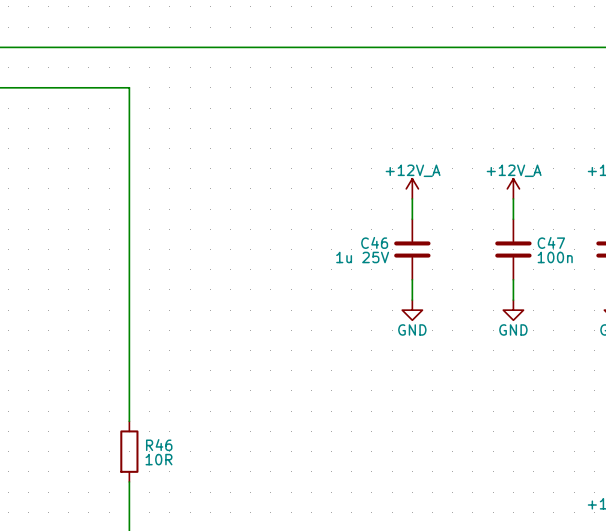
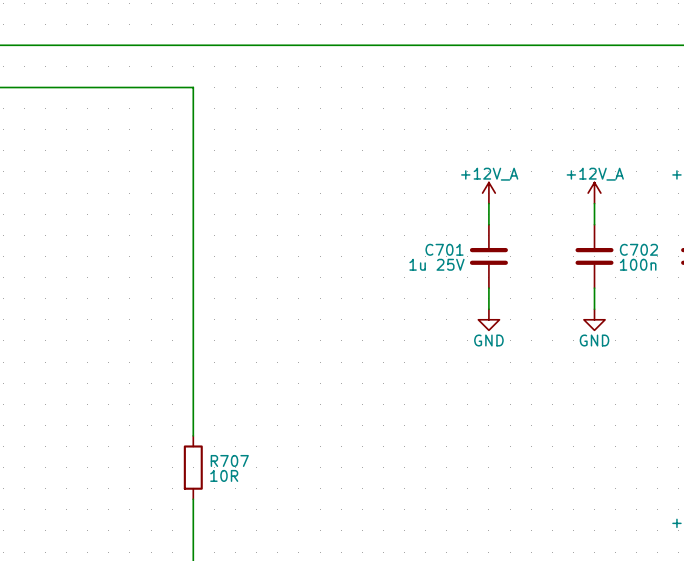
C46 name: C46 (374, 242) -> C701 (444, 249)
C47 name: C47 (551, 242) -> C702 (638, 249)
R46 name: R46 (159, 445) -> R707 (229, 460)

